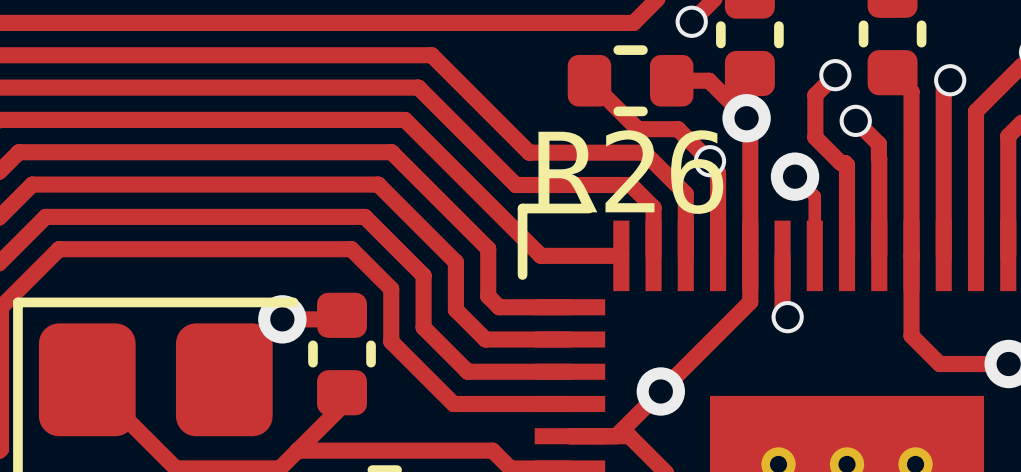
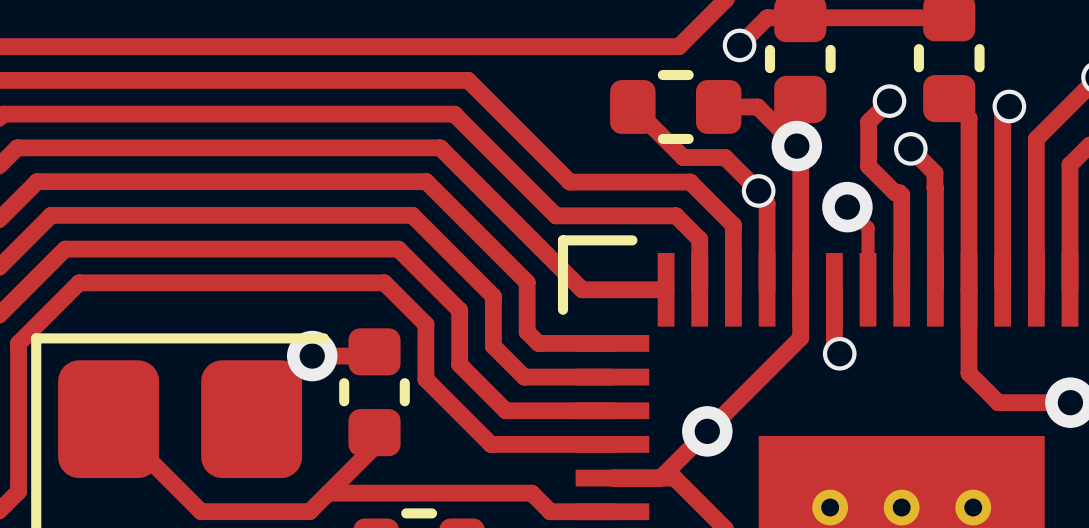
R26 name: R26 (630, 172) -> none

